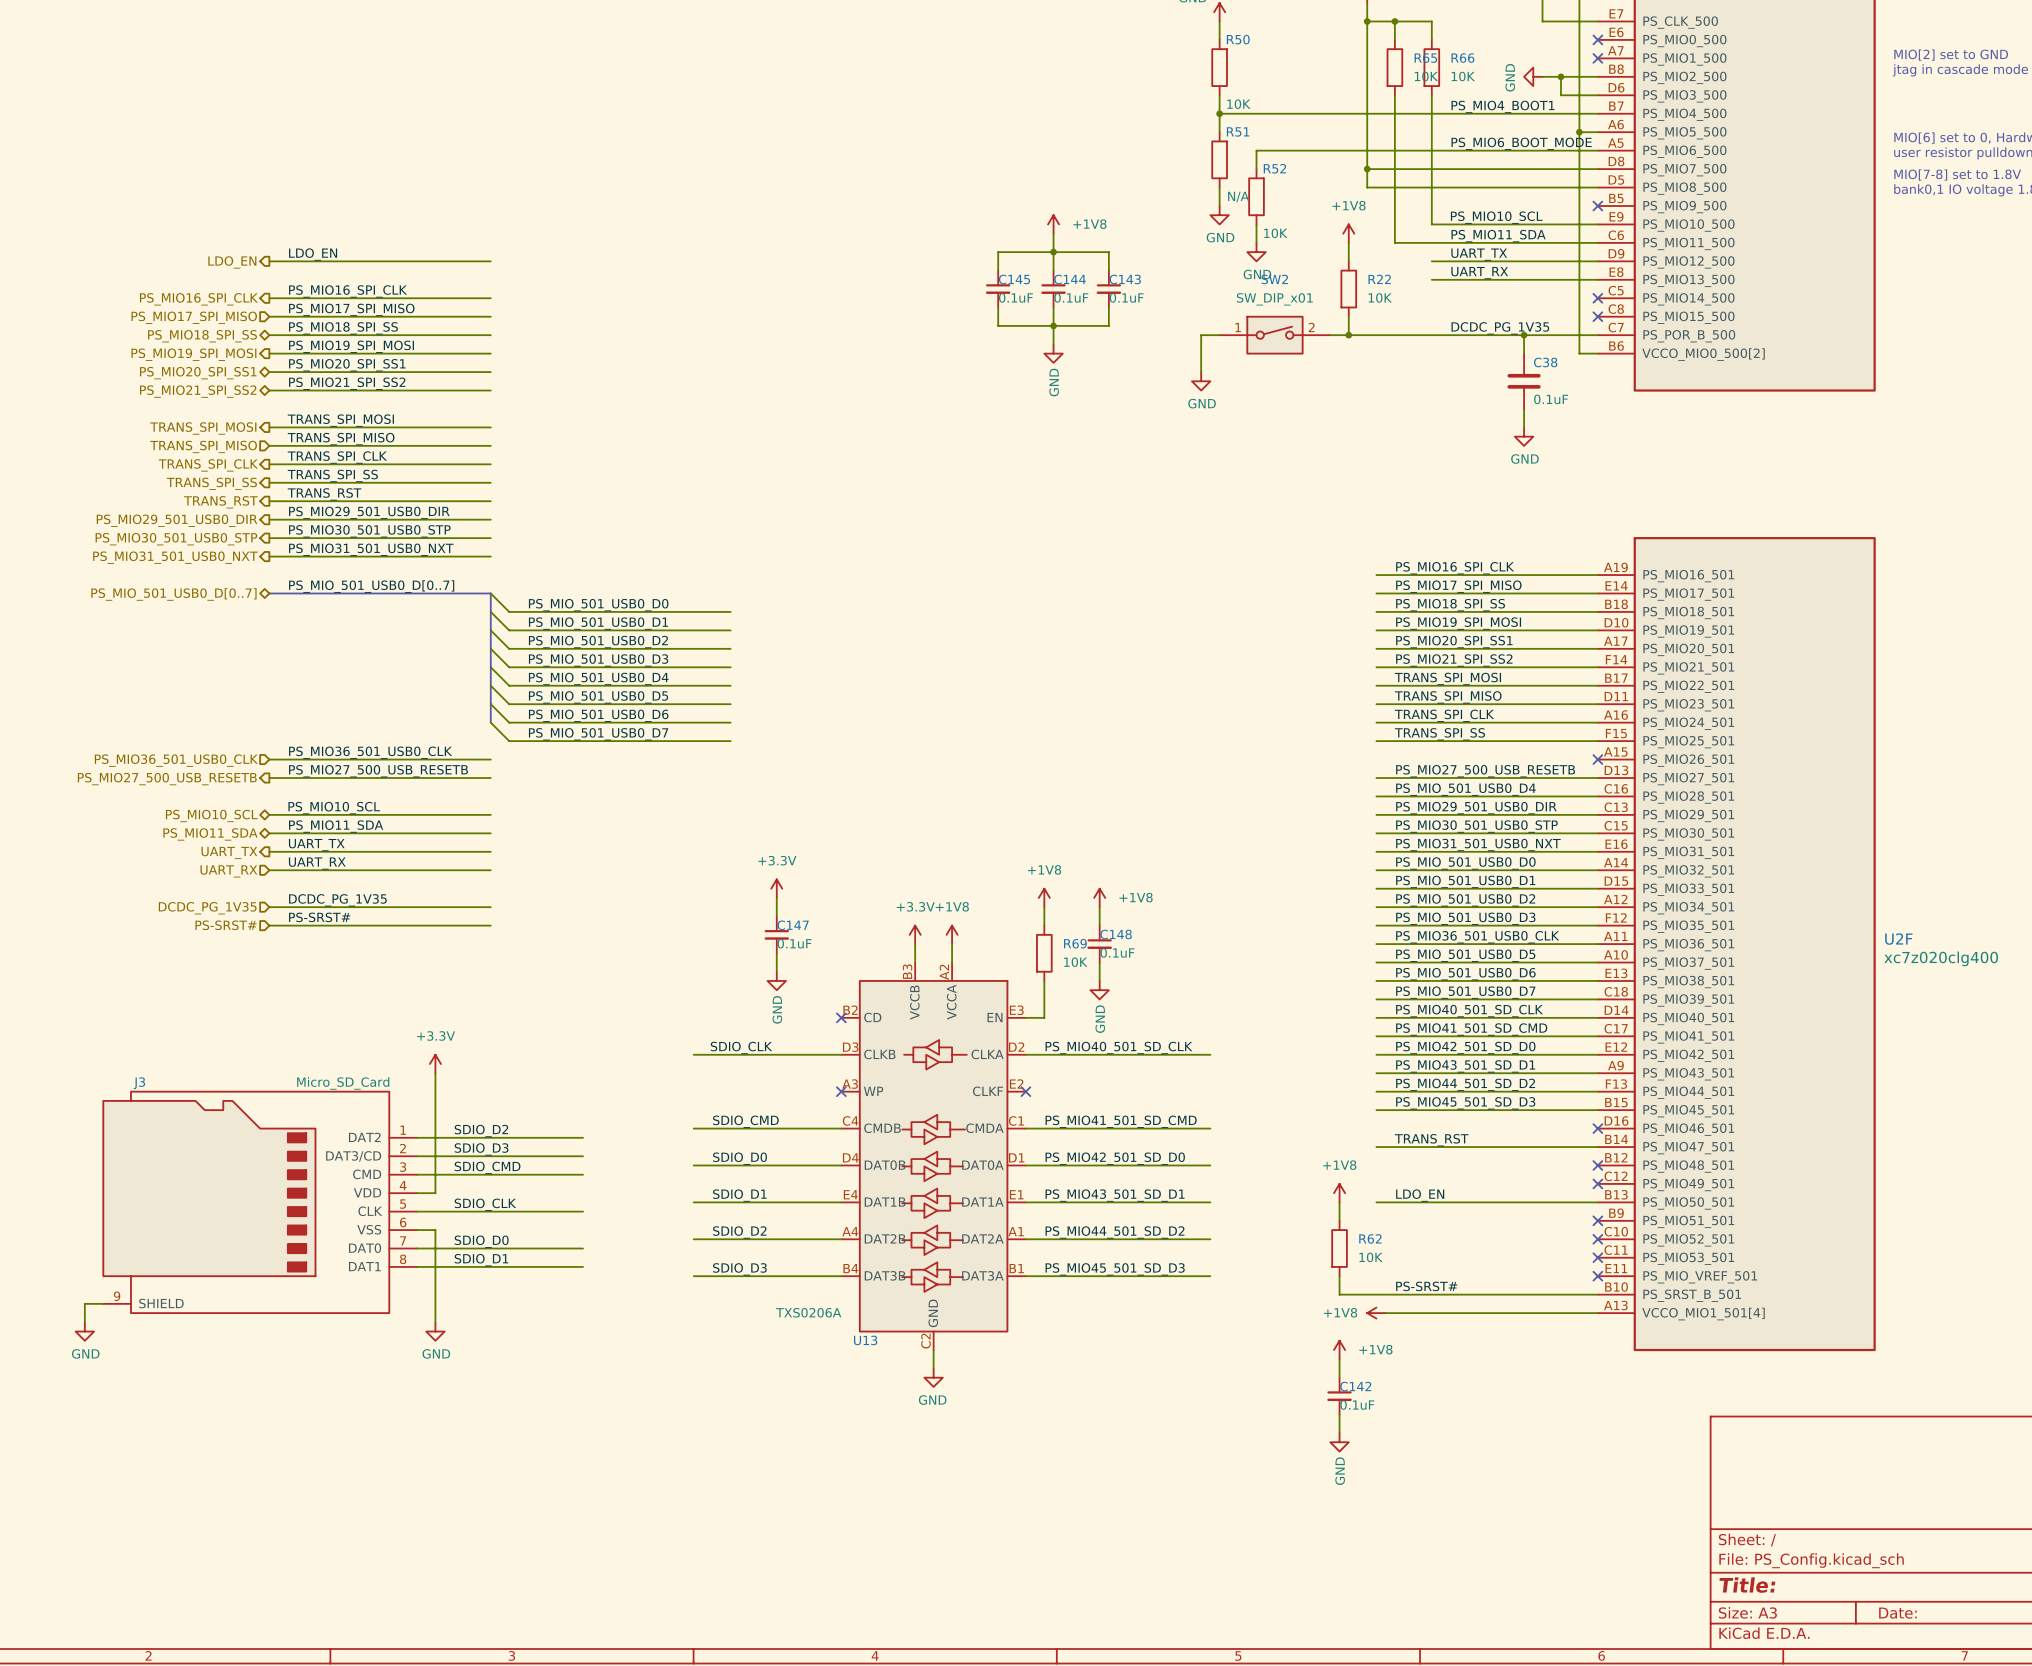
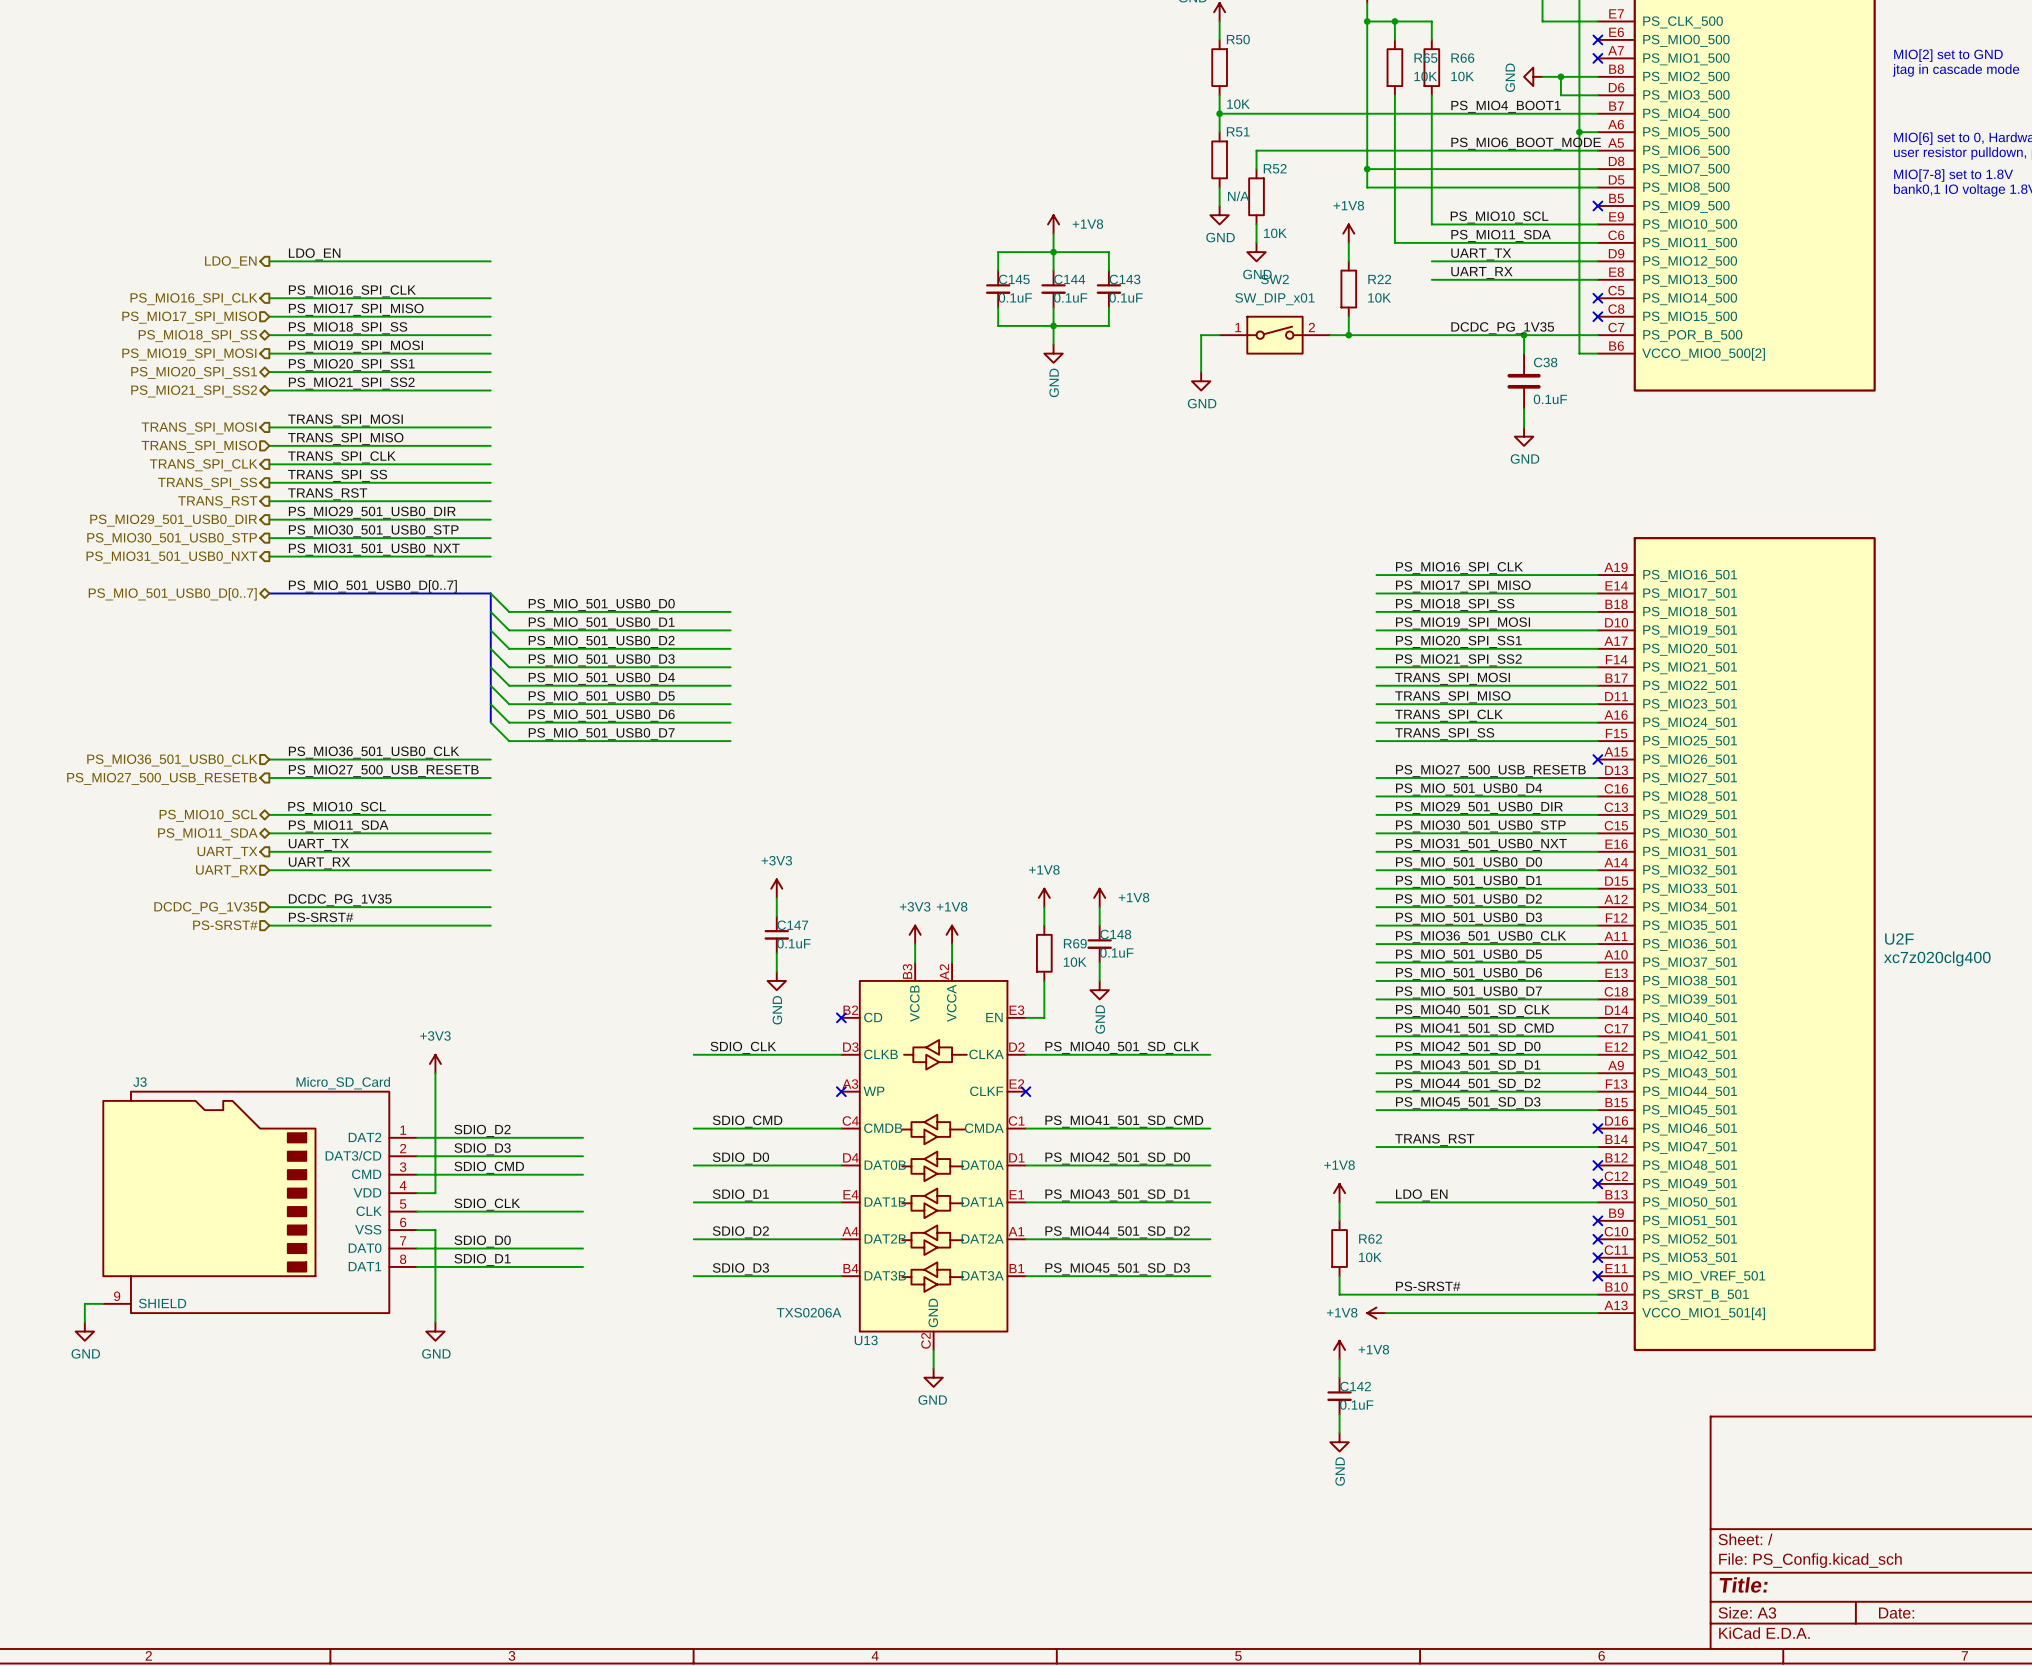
power symbol: +3.3V (776, 888) -> +3V3 (776, 888)
power symbol: +3.3V (915, 934) -> +3V3 (915, 934)
power symbol: +3.3V (435, 1064) -> +3V3 (435, 1064)

